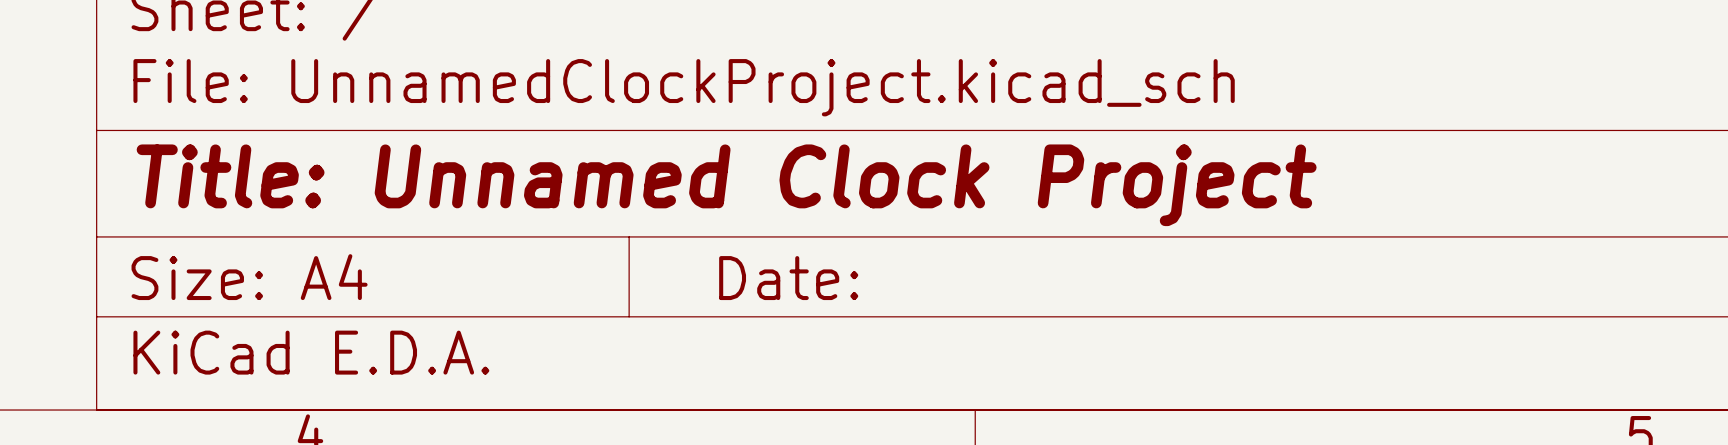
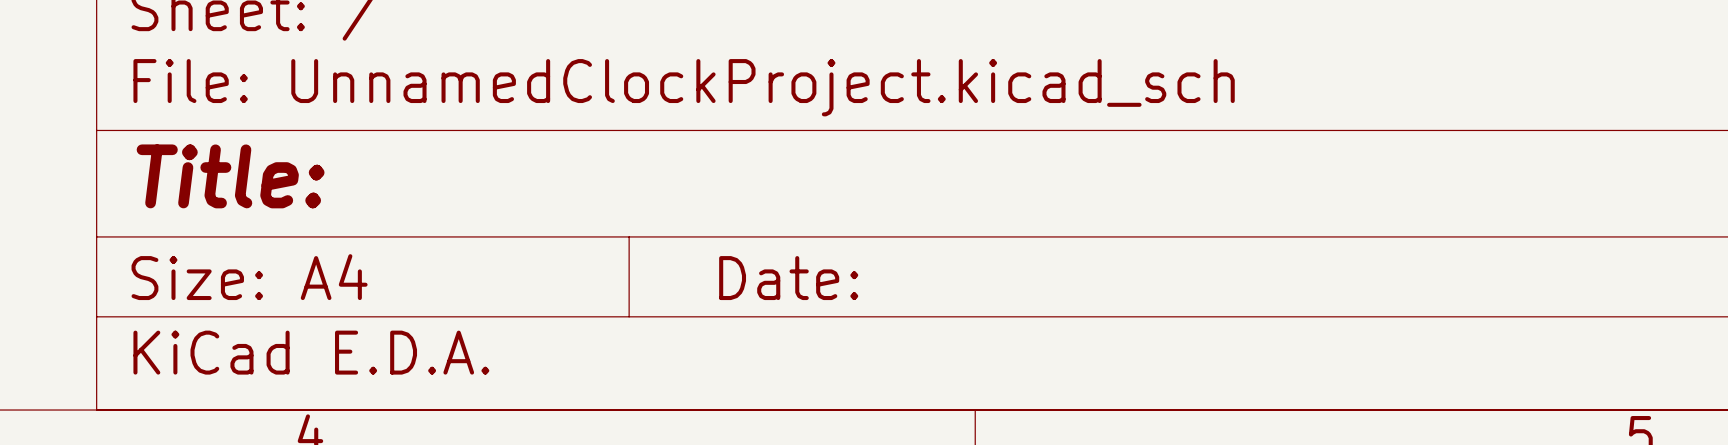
title block: Title: Unnamed Clock Project (726, 185) -> Title: (230, 176)

